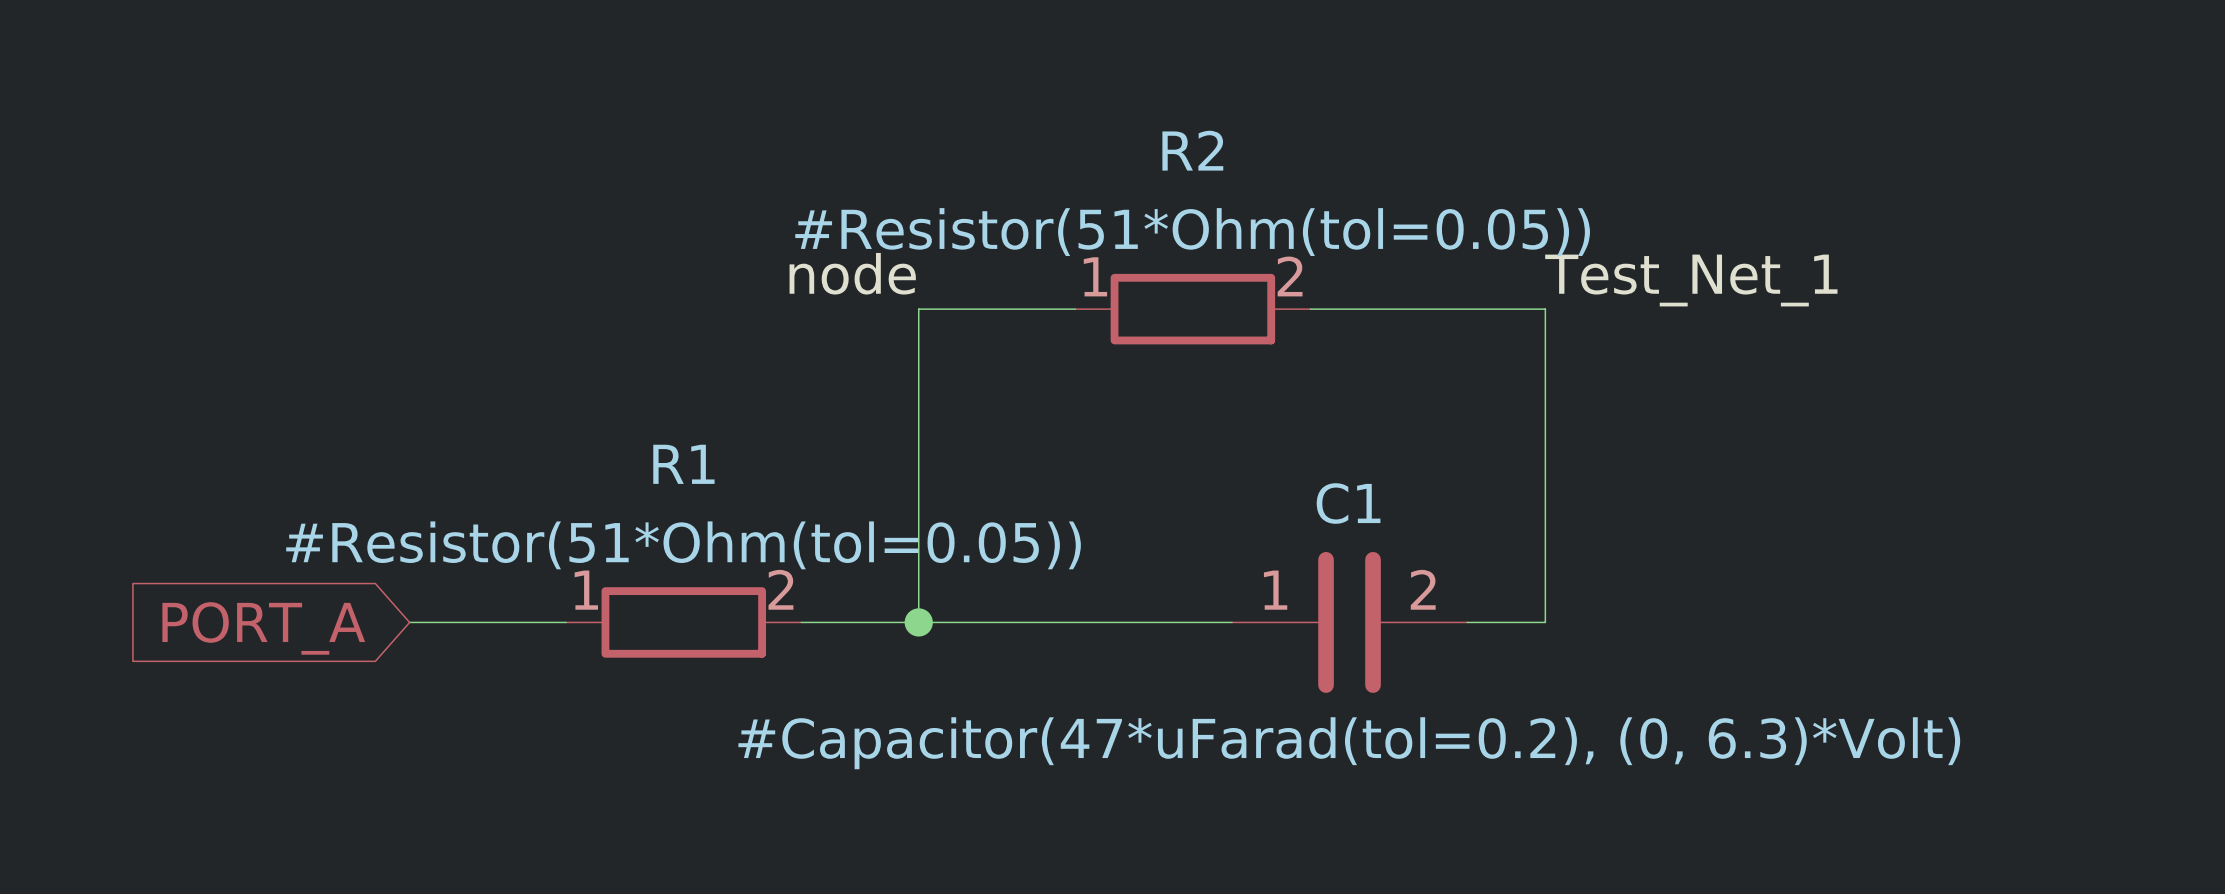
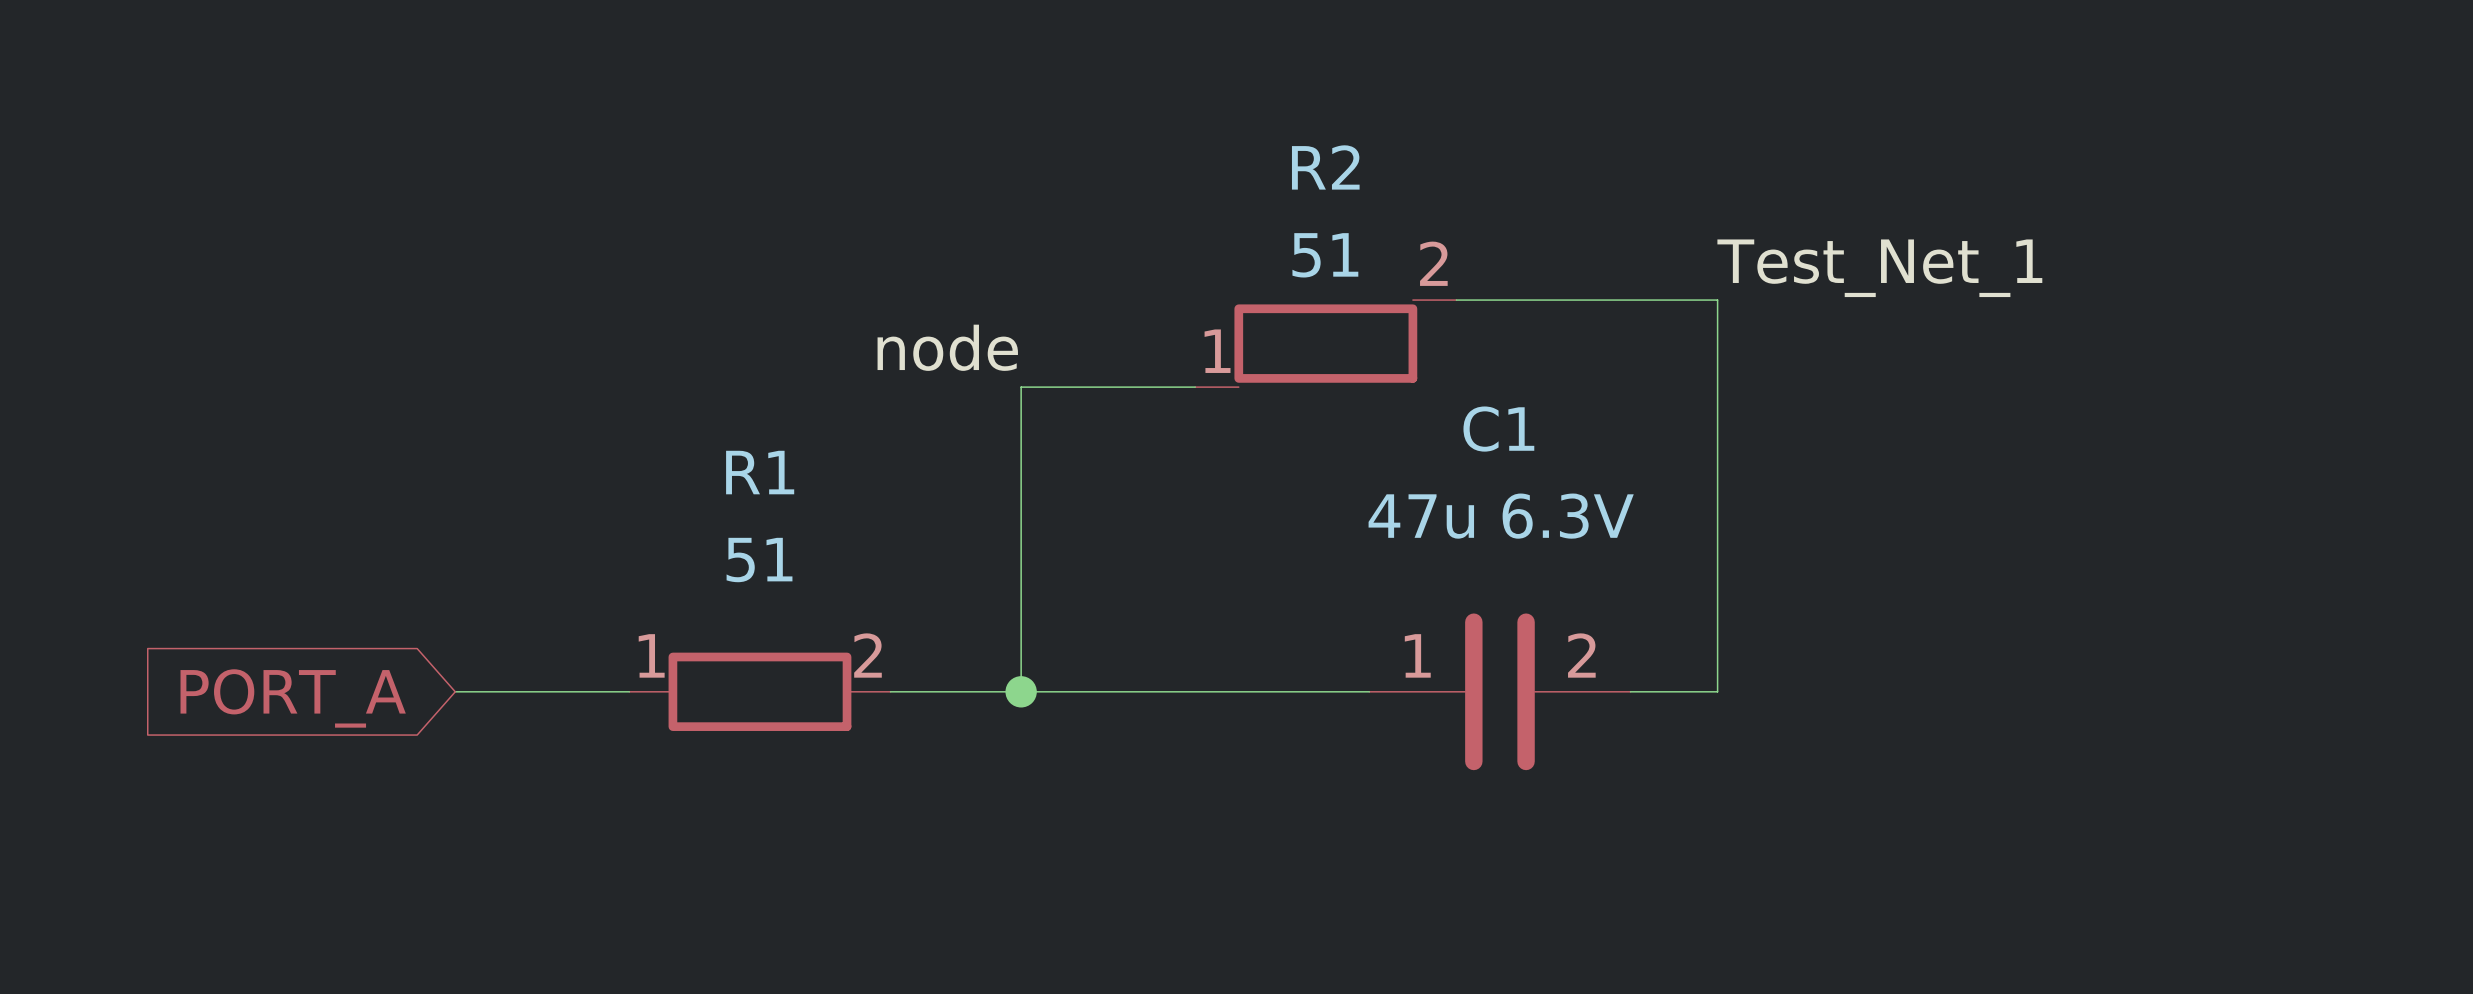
R2 value: #Resistor(51*Ohm(tol=0.05)) (1192, 232) -> 51 (1325, 255)
label position: node (852, 273) -> node (947, 347)
R2 symbol: [1075, 273, 1311, 345] -> [1195, 300, 1457, 388]
label position: Test_Net_1 (1691, 280) -> Test_Net_1 (1879, 268)
wire: (1075, 309) (918, 309) (918, 348) -> (1195, 387) (1021, 387)
wire: (1310, 309) (1545, 309) -> (1456, 300) (1717, 300) (1717, 343)
R1 name position: R1 (683, 464) -> R1 (760, 472)
C1 name position: C1 (1348, 503) -> C1 (1498, 429)
R1 value: #Resistor(51*Ohm(tol=0.05)) (683, 545) -> 51 (759, 560)
C1 value: #Capacitor(47*uFarad(tol=0.2), (0, 6.3)*Volt) (1349, 743) -> 47u 6.3V (1501, 516)

